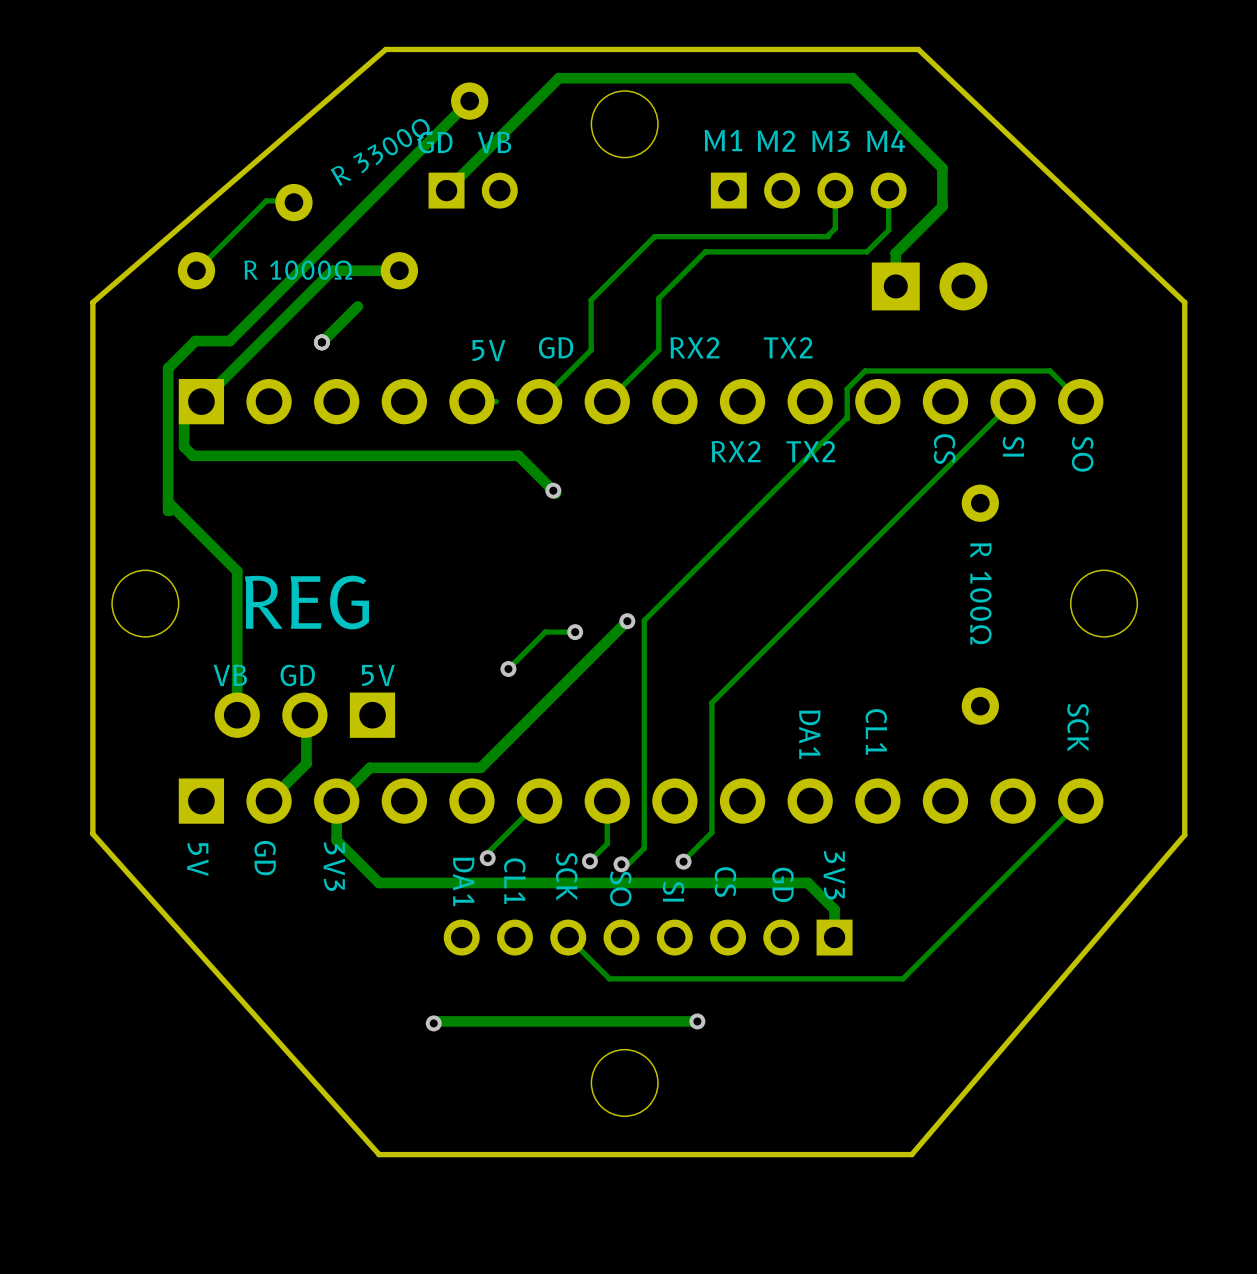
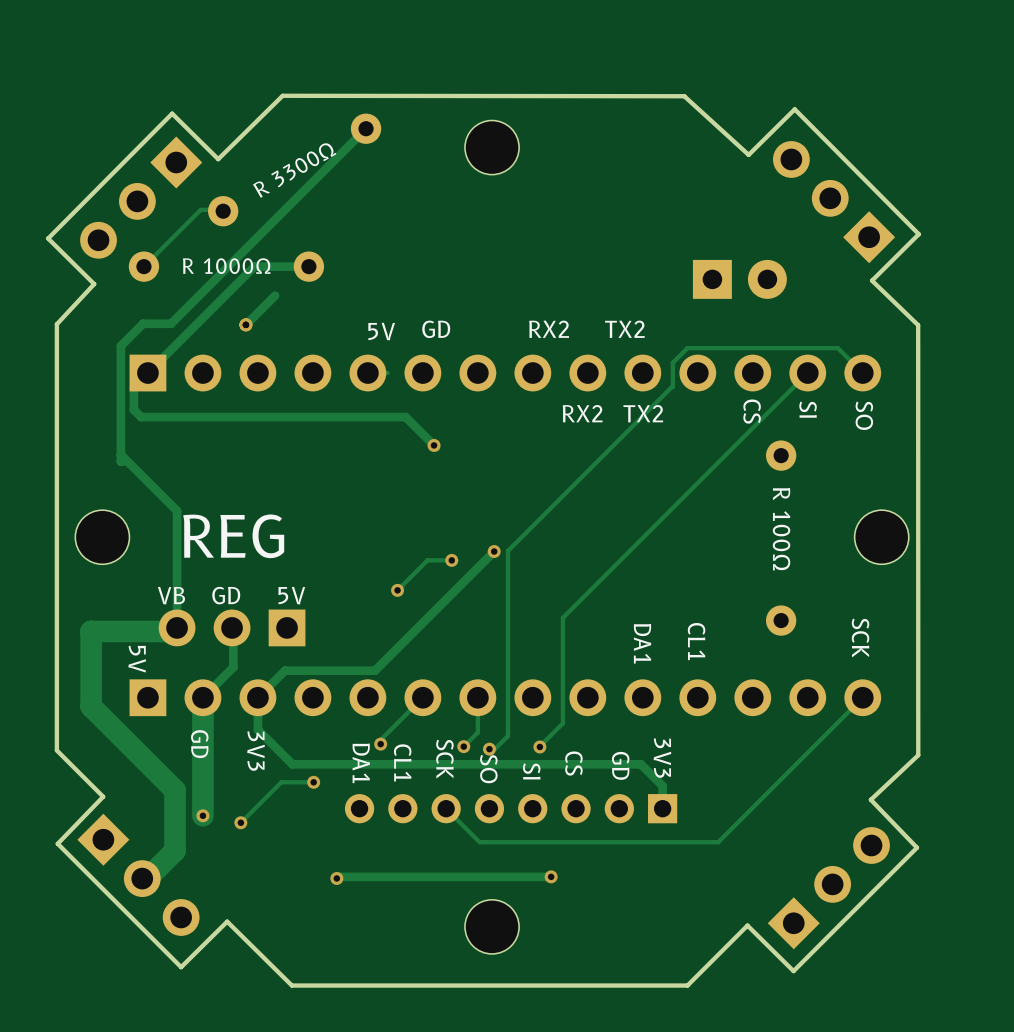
board edge: (918, 49) (1184, 302) (1184, 835) (911, 1154) (379, 1154) (92, 833) (92, 302) (385, 49) (918, 49) -> none
text: M1 (723, 140) -> none
text: M2 (776, 141) -> none
text: M3 (831, 141) -> none
text: M4 (886, 141) -> none
text: GD (435, 142) -> none
text: VB (494, 142) -> none
part: none -> (141, 197)
track: (446, 190) (558, 78) (852, 78) (942, 168) (942, 206) (895, 253) (895, 286) -> none
part: (473, 190) -> none
part: (808, 190) -> none
track: (835, 190) (835, 228) (828, 236) (654, 236) (591, 300) (591, 350) (539, 401) -> none
track: (888, 190) (888, 230) (867, 251) (705, 251) (658, 298) (658, 350) (607, 401) -> none
part: none -> (834, 202)
board edge: none -> (918, 325) (872, 280) (918, 234) (794, 109) (748, 154) (684, 96) (282, 95) (218, 159) (172, 113) (48, 238) (94, 284) (56, 324) (56, 750)
board edge: none -> (918, 325) (918, 755) (870, 799) (916, 847) (793, 971) (747, 925) (687, 985) (291, 985)
track: none -> (177, 627) (173, 631) (90, 631)
track: none -> (91, 631) (91, 706) (175, 790) (175, 850) (140, 884)
track: none -> (202, 697) (202, 815)
text position: 5V (197, 859) -> 5V (137, 659)
board edge: none -> (56, 750) (103, 796) (57, 843) (181, 967) (227, 921) (291, 985)
track: none -> (313, 782) (281, 782) (240, 822)
via: none -> (313, 782)
via: none -> (202, 815)
via: none -> (240, 822)
part: none -> (138, 874)
part: none -> (828, 888)

